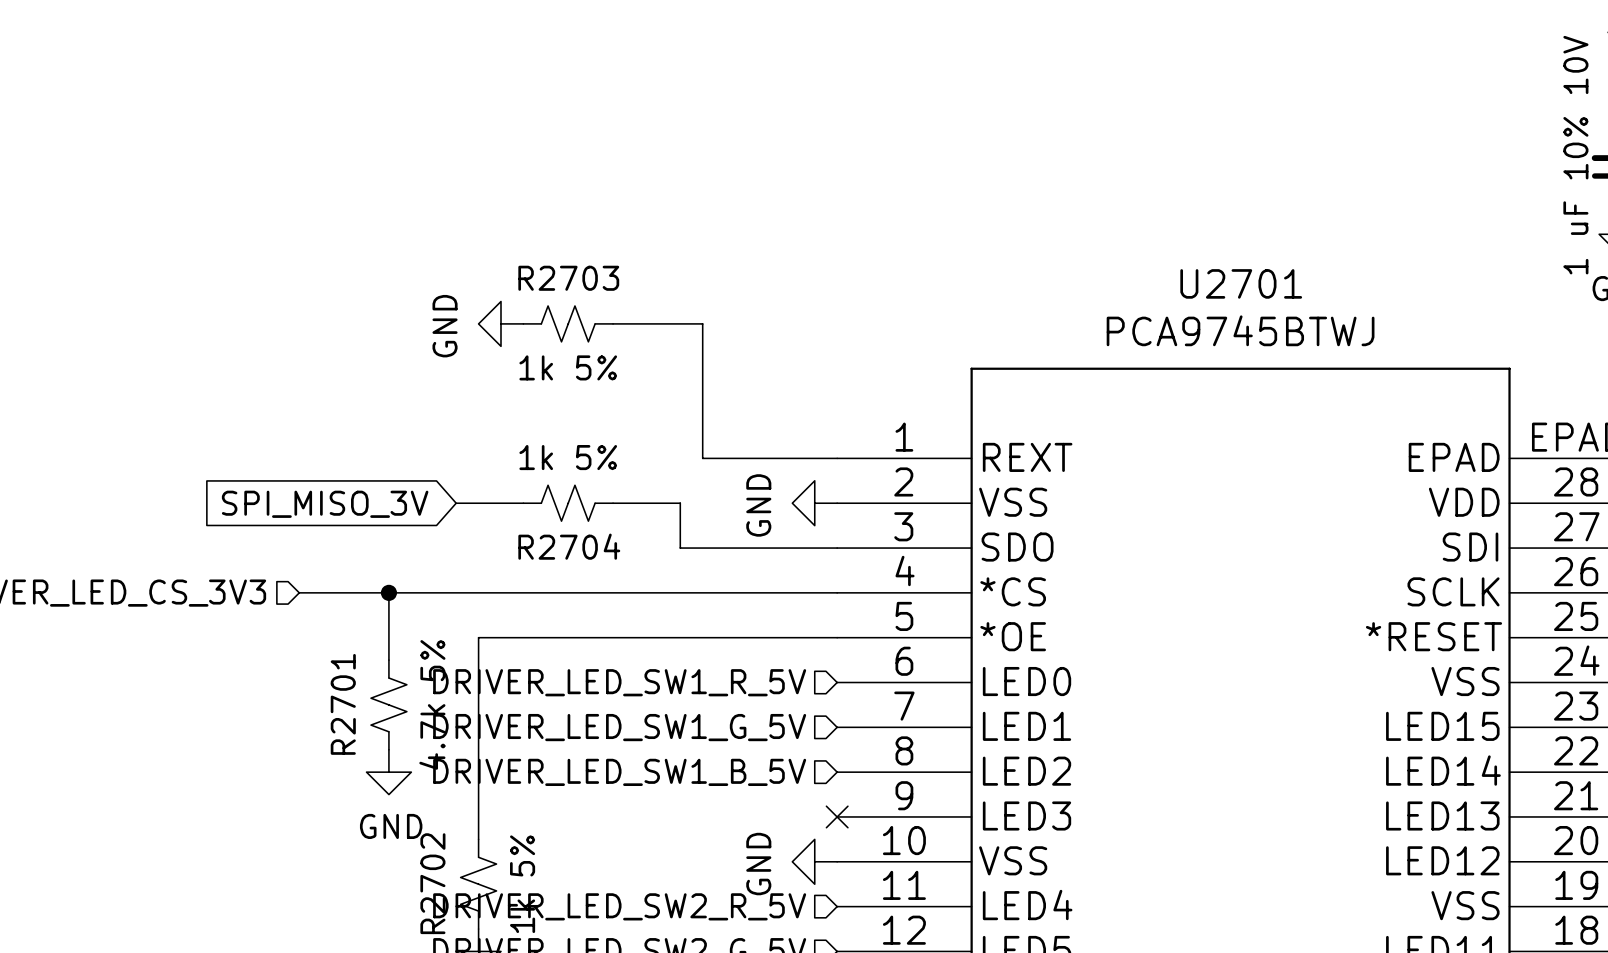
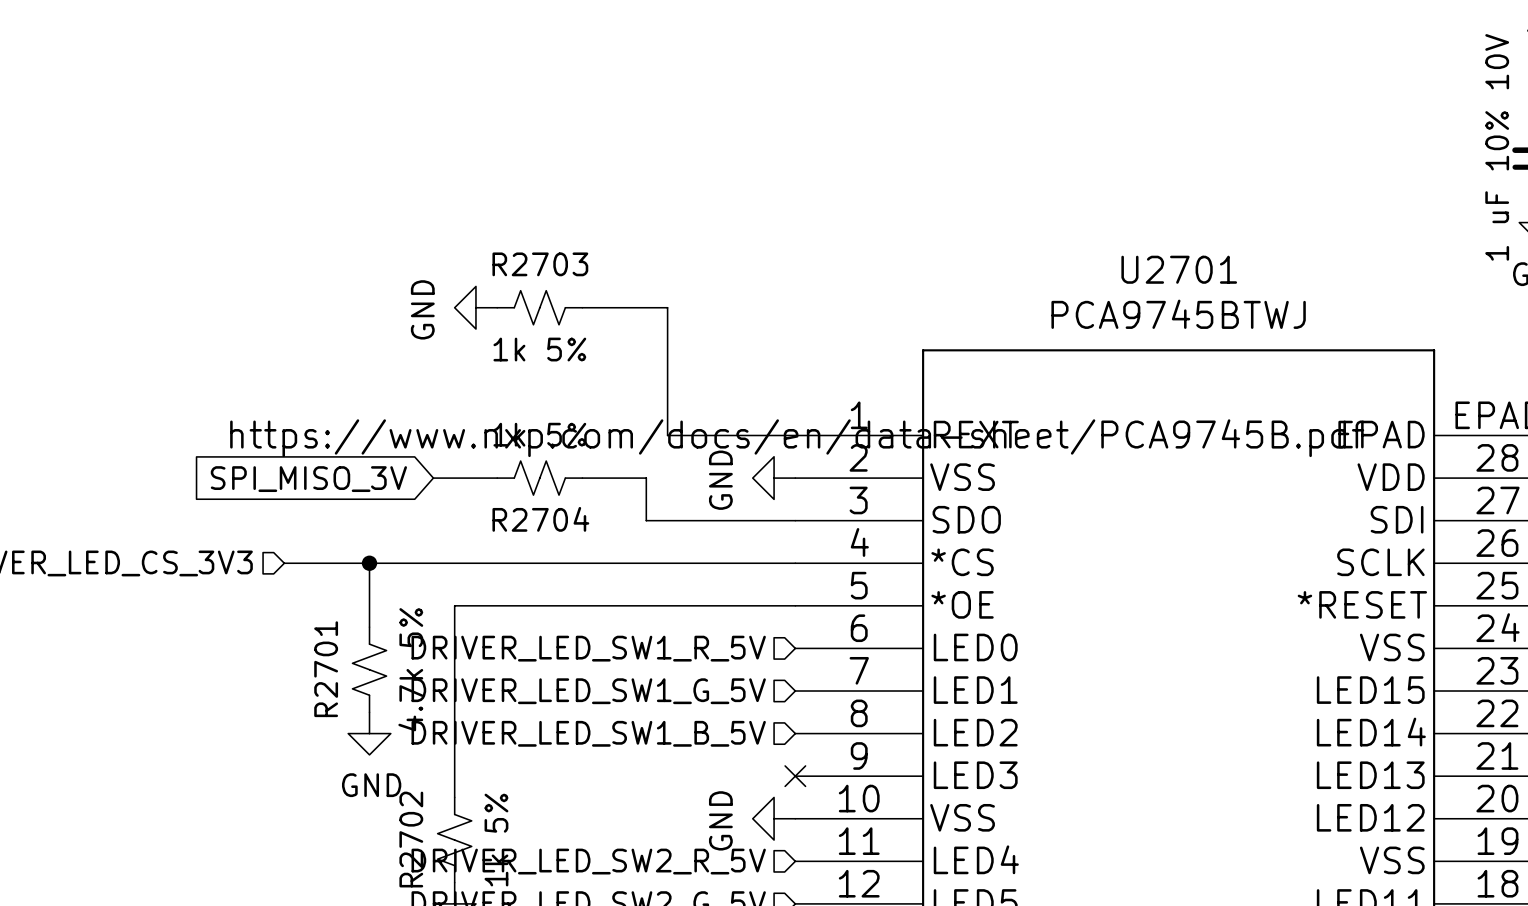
U2701 text: none -> https://www.nxp.com/docs/en/data-sheet/PCA9745B.pdf (797, 438)

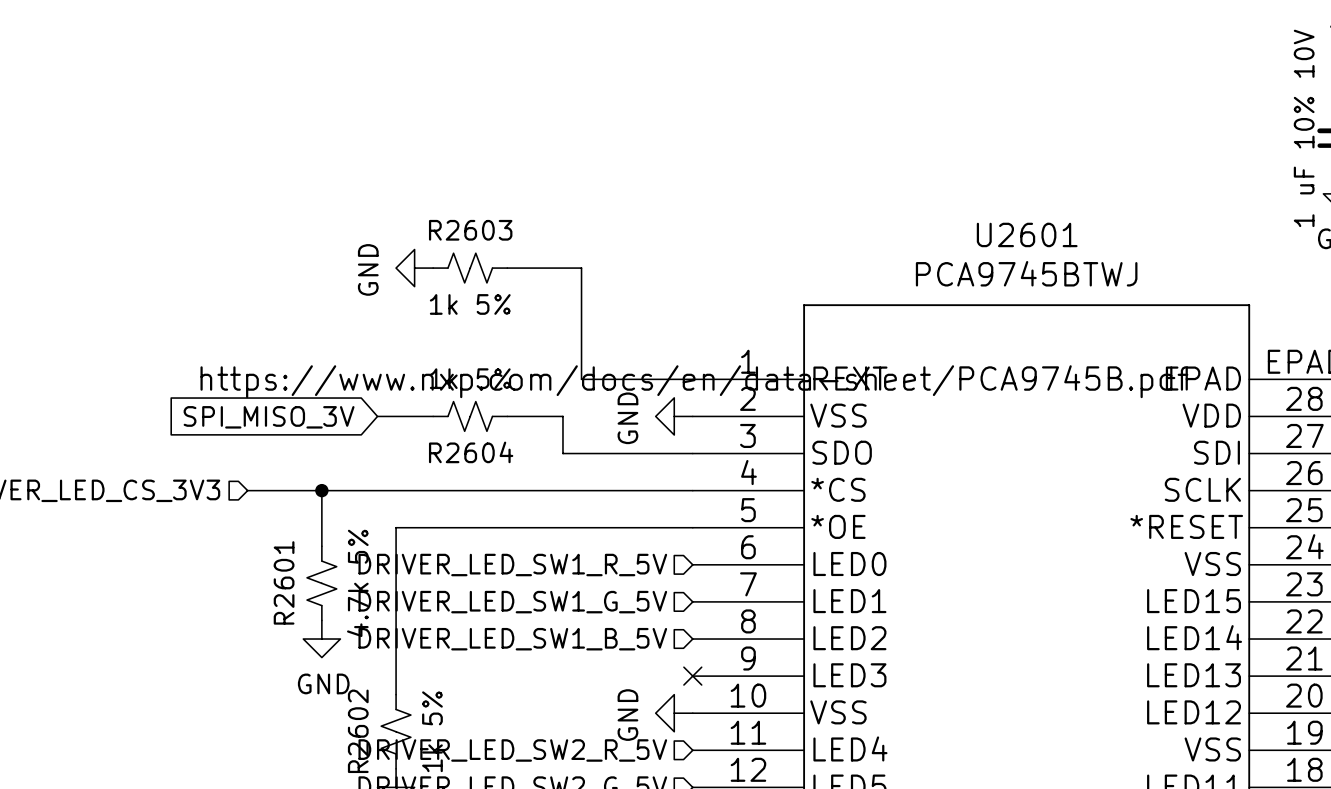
R2703 name: R2703 (540, 264) -> R2603 (470, 230)
U2701 name: U2701 (1179, 269) -> U2601 (1027, 234)
R2704 name: R2704 (540, 519) -> R2604 (471, 452)
R2701 name: R2701 (326, 669) -> R2601 (284, 582)
R2702 name: R2702 (411, 839) -> R2602 (358, 731)

